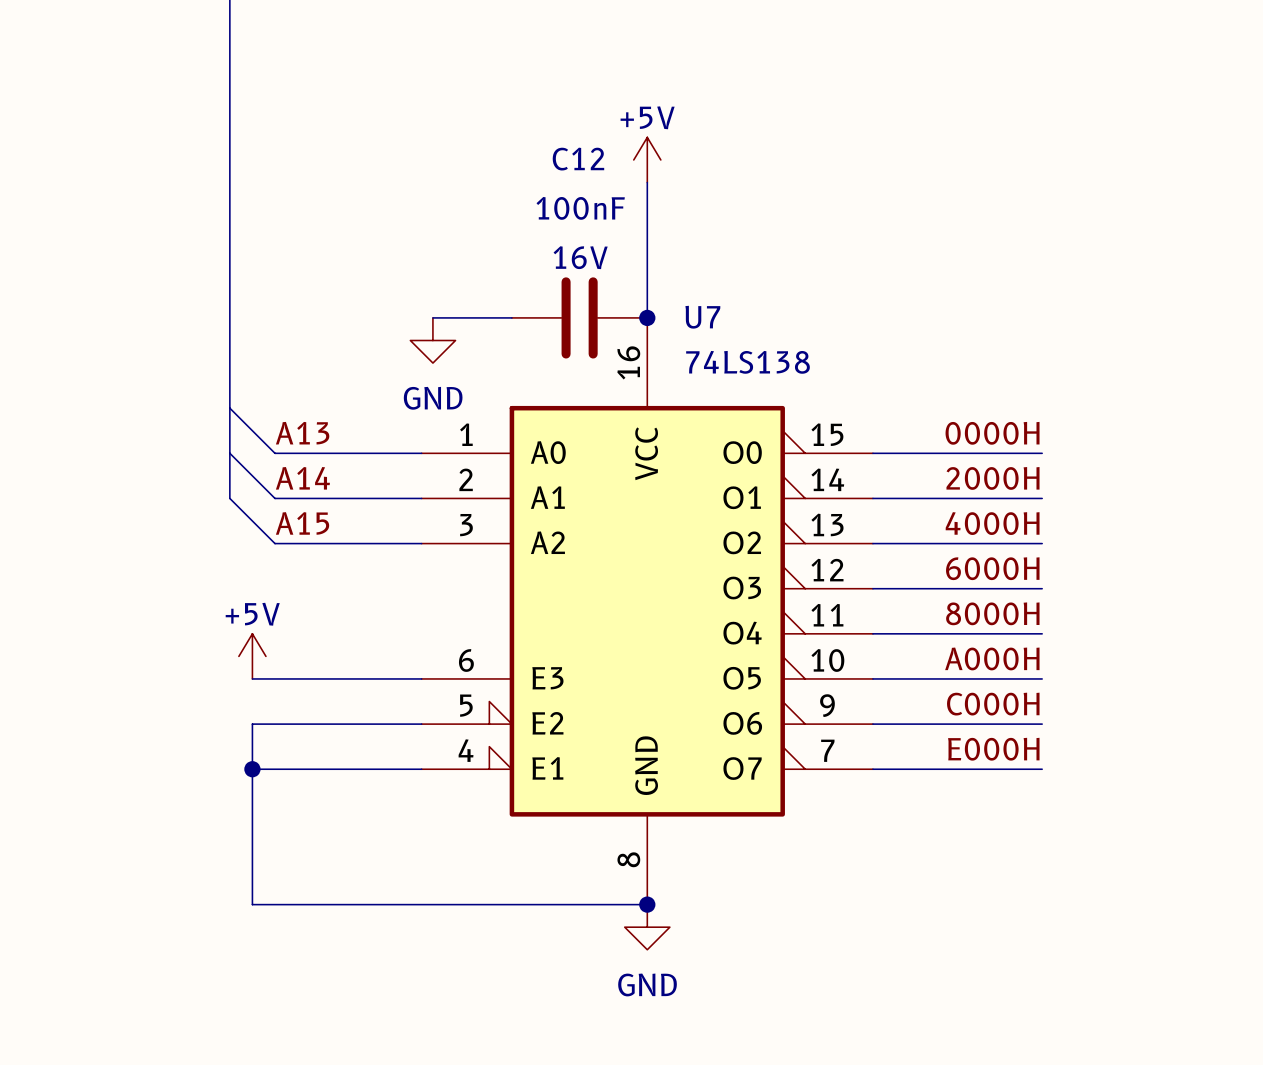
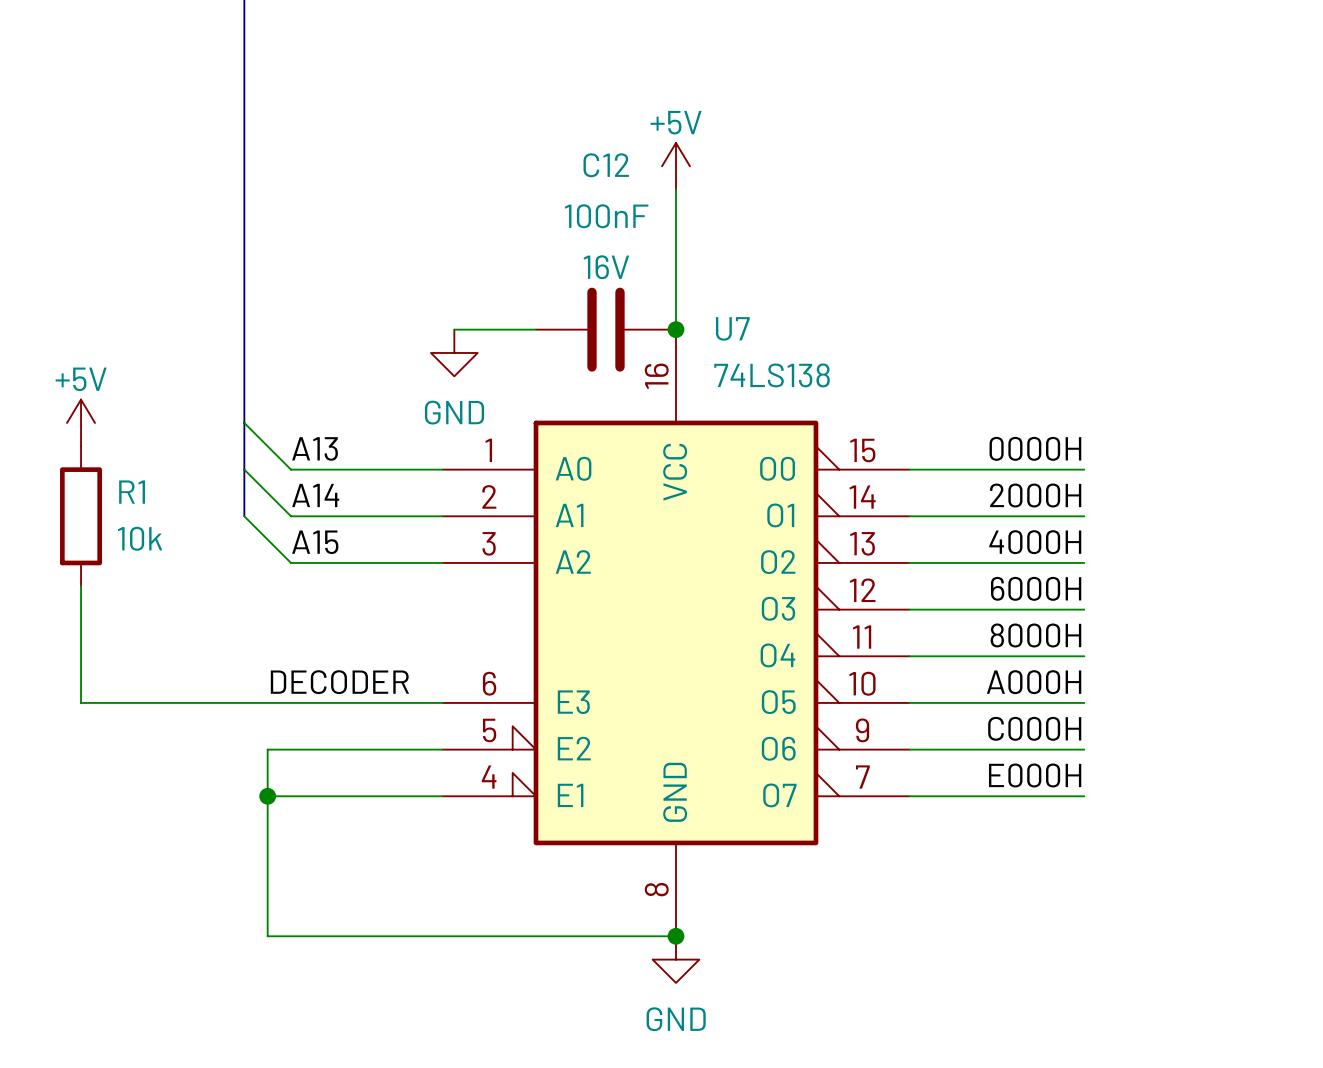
R1: none -> (81, 516)
wire: none -> (81, 586) (81, 702) (267, 702)
power symbol position: +5V (252, 656) -> +5V (81, 422)
label: none -> DECODER (339, 682)

